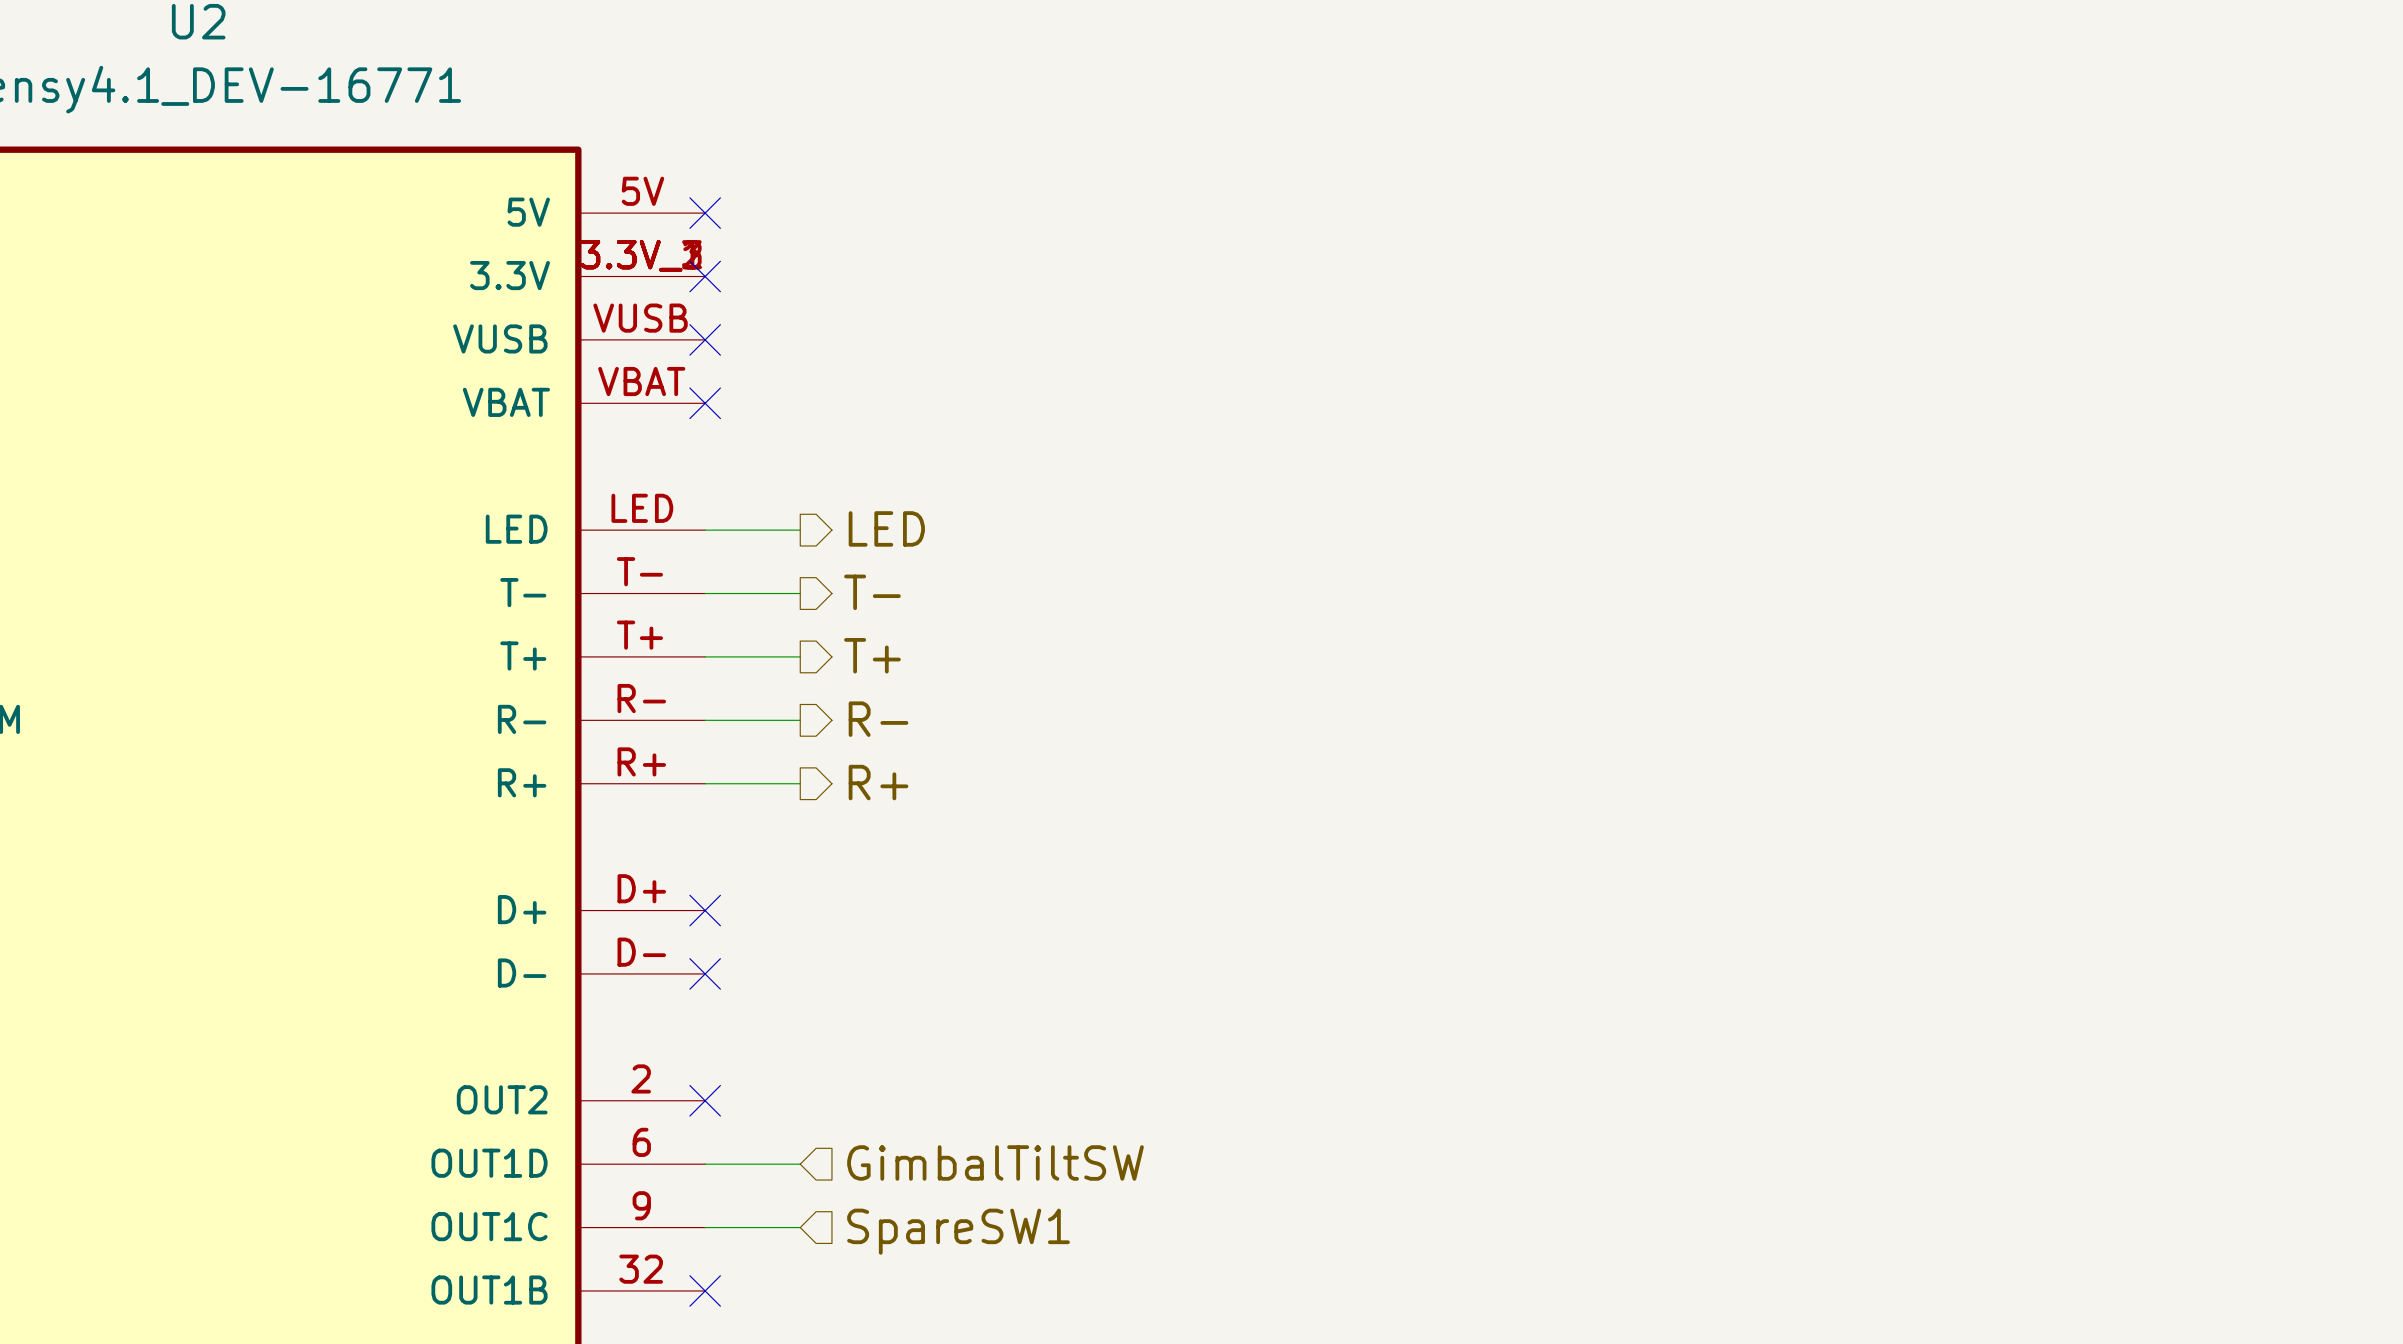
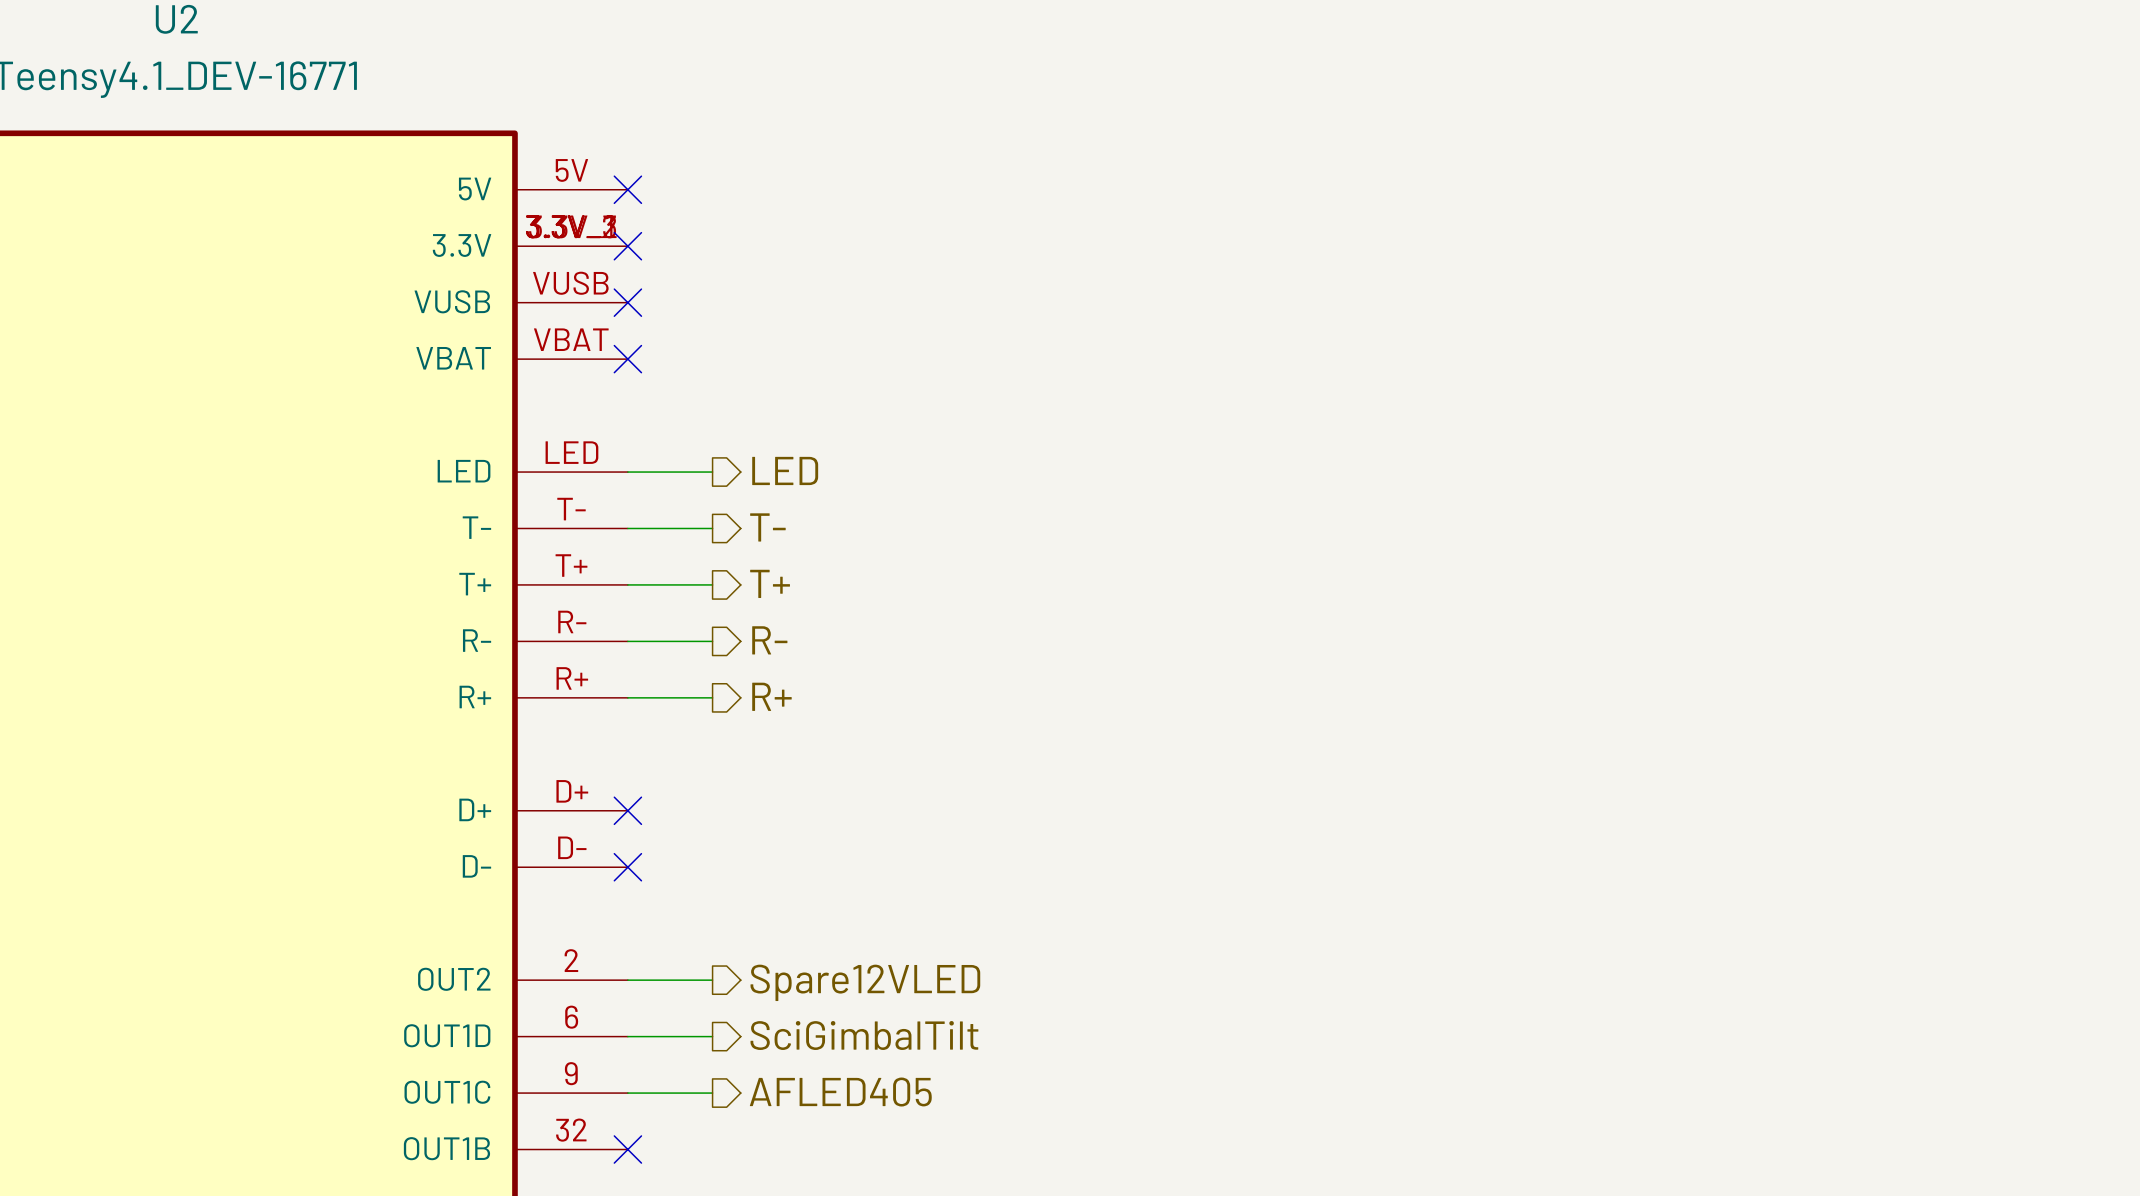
wire: none -> (627, 980) (712, 980)
no-connect mark: (705, 1100) -> none
hierarchical label: none -> Spare12VLED (865, 982)
hierarchical label shape: input (995, 1162) -> output (864, 1035)
hierarchical label: GimbalTiltSW (995, 1162) -> SciGimbalTilt (864, 1035)
hierarchical label shape: input (958, 1231) -> output (840, 1092)
hierarchical label: SpareSW1 (958, 1231) -> AFLED405 (840, 1092)

